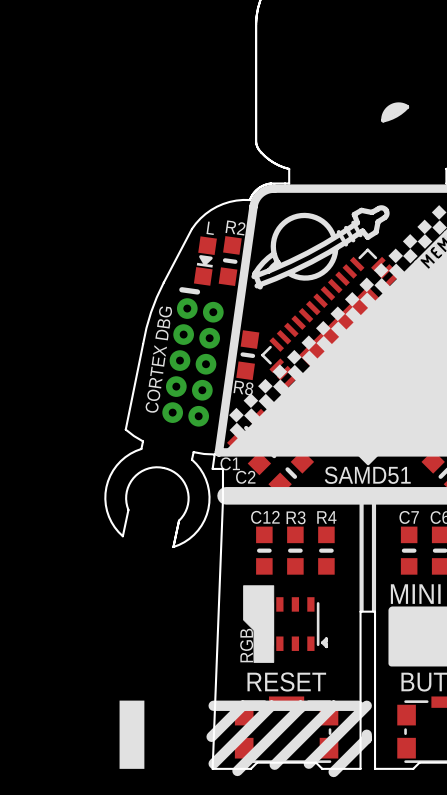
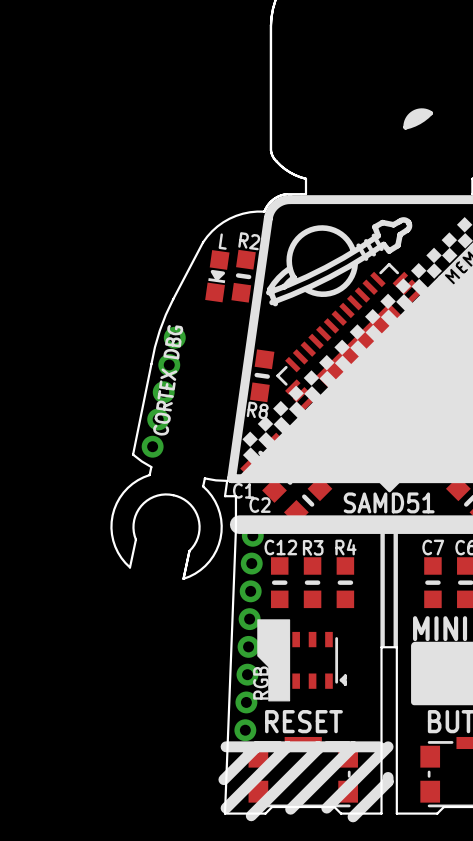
part: (192, 356) -> none
part: none -> (163, 392)
part: none -> (249, 633)
drawing: [119, 700, 145, 769] -> none

